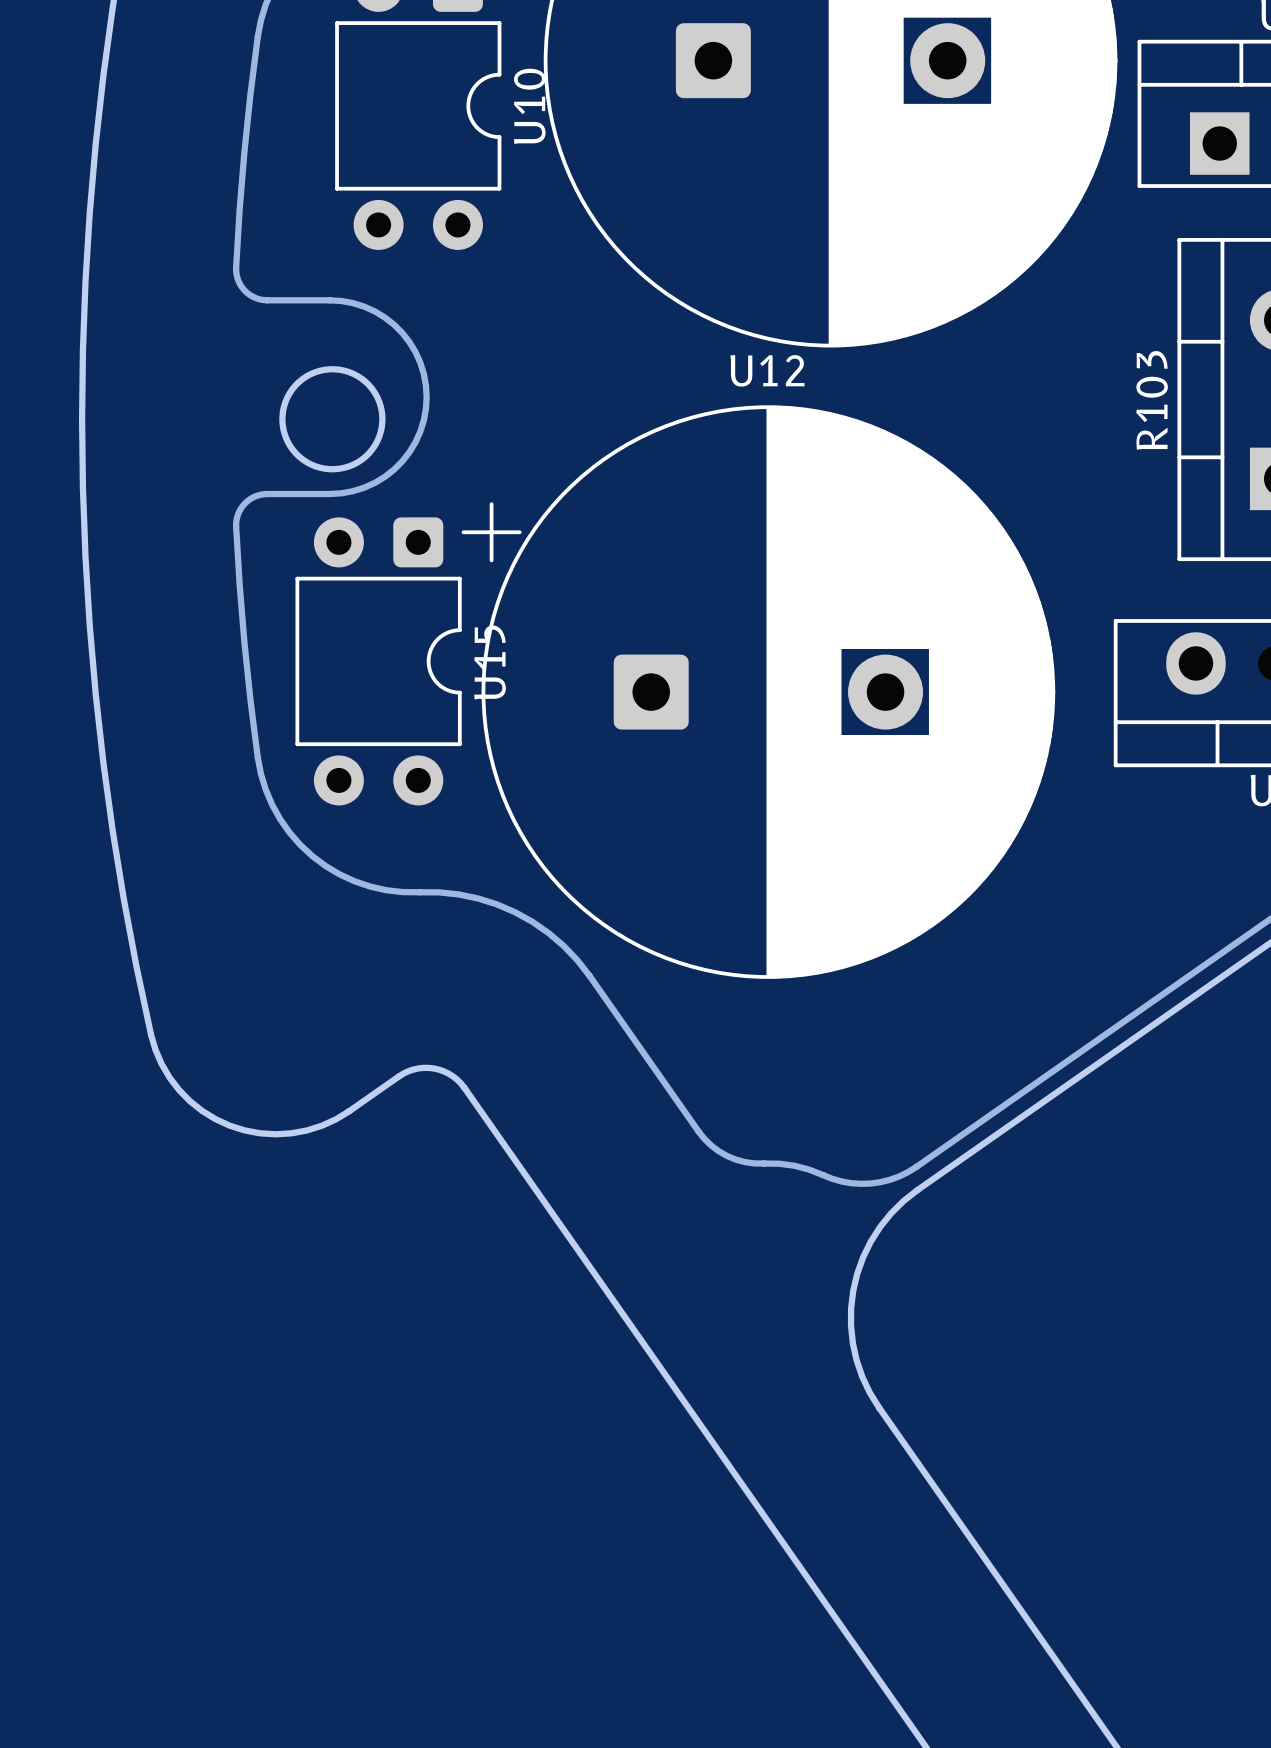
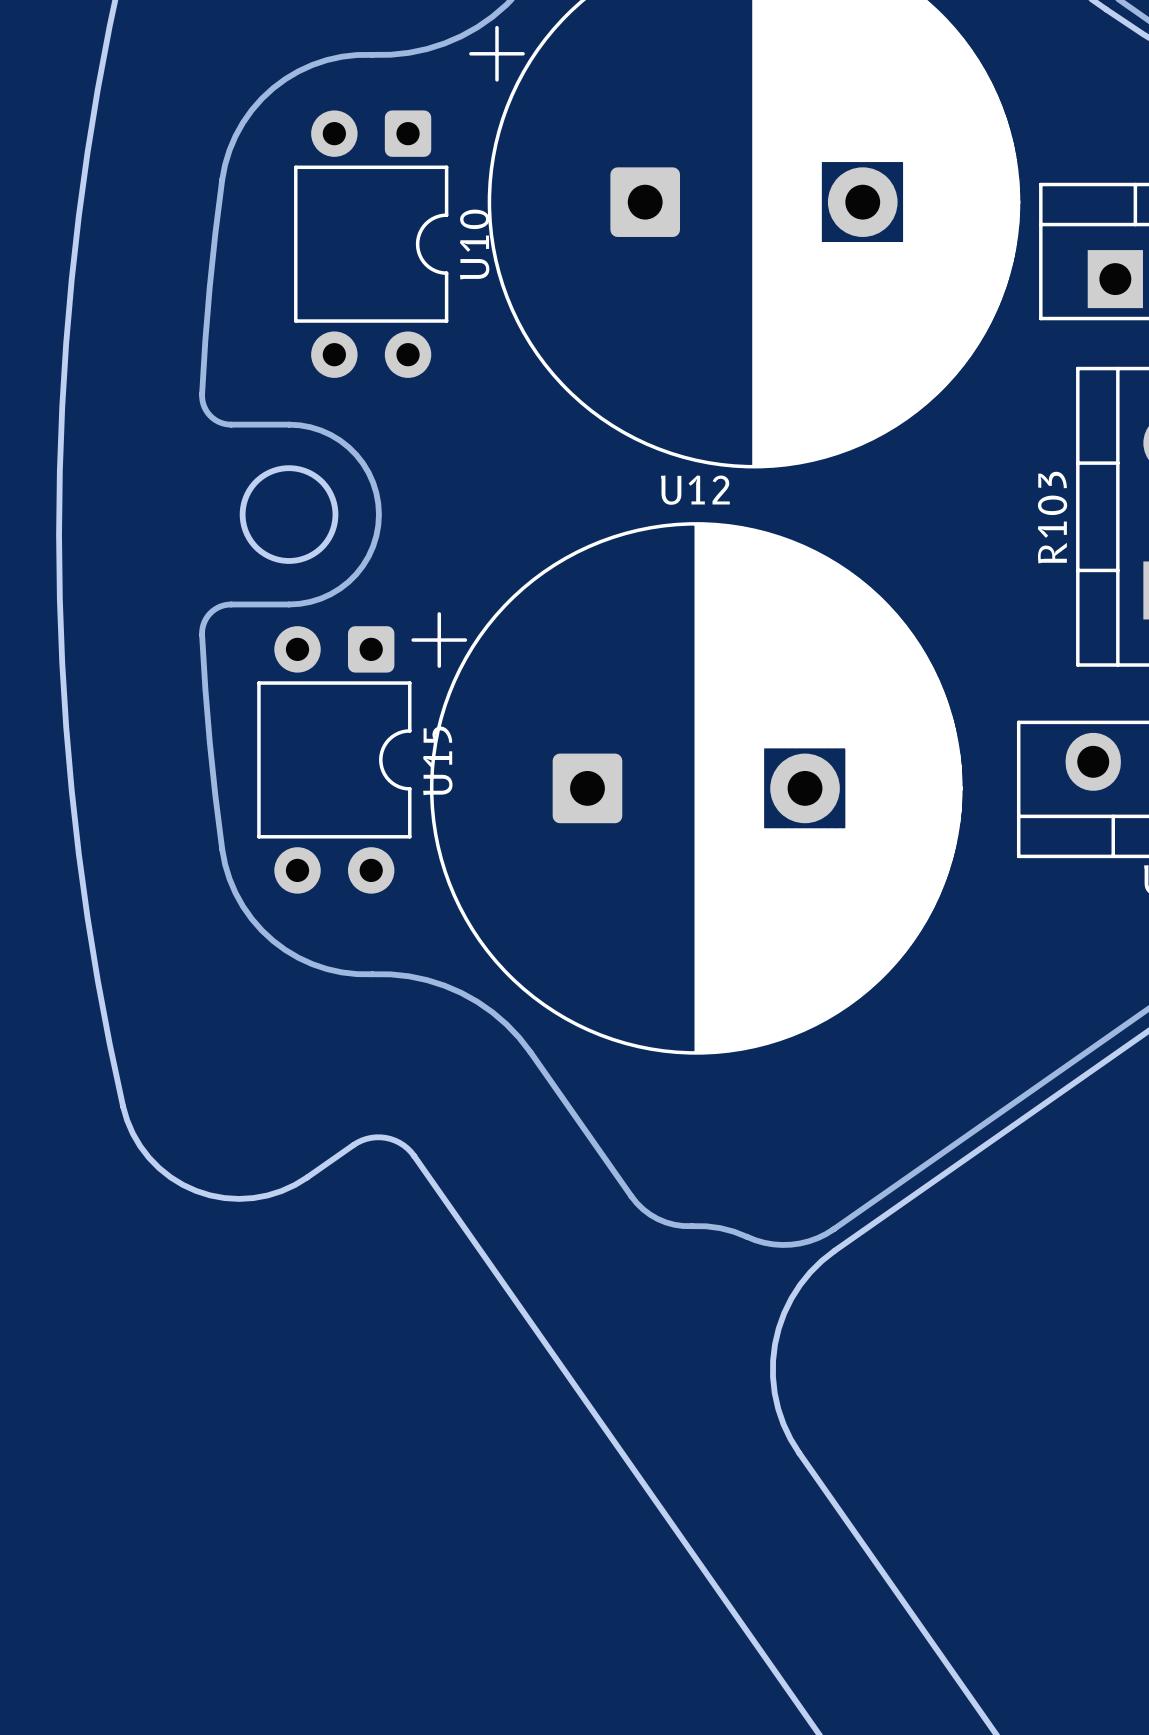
round board edge position: (332, 419) -> (289, 514)

